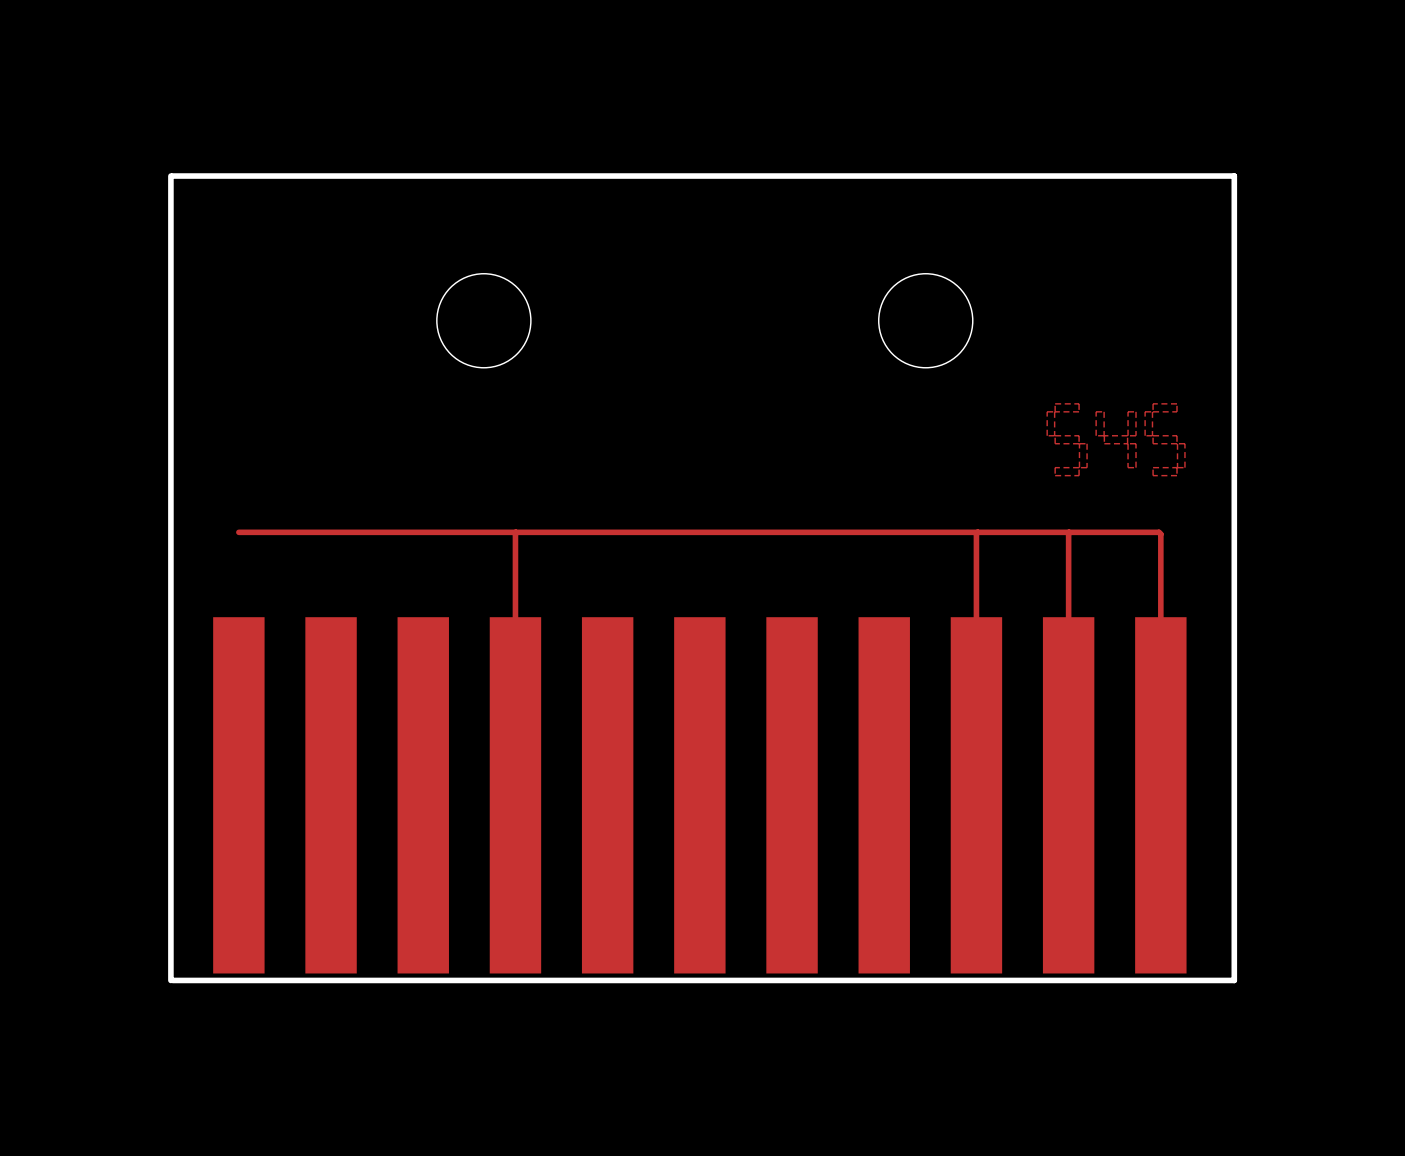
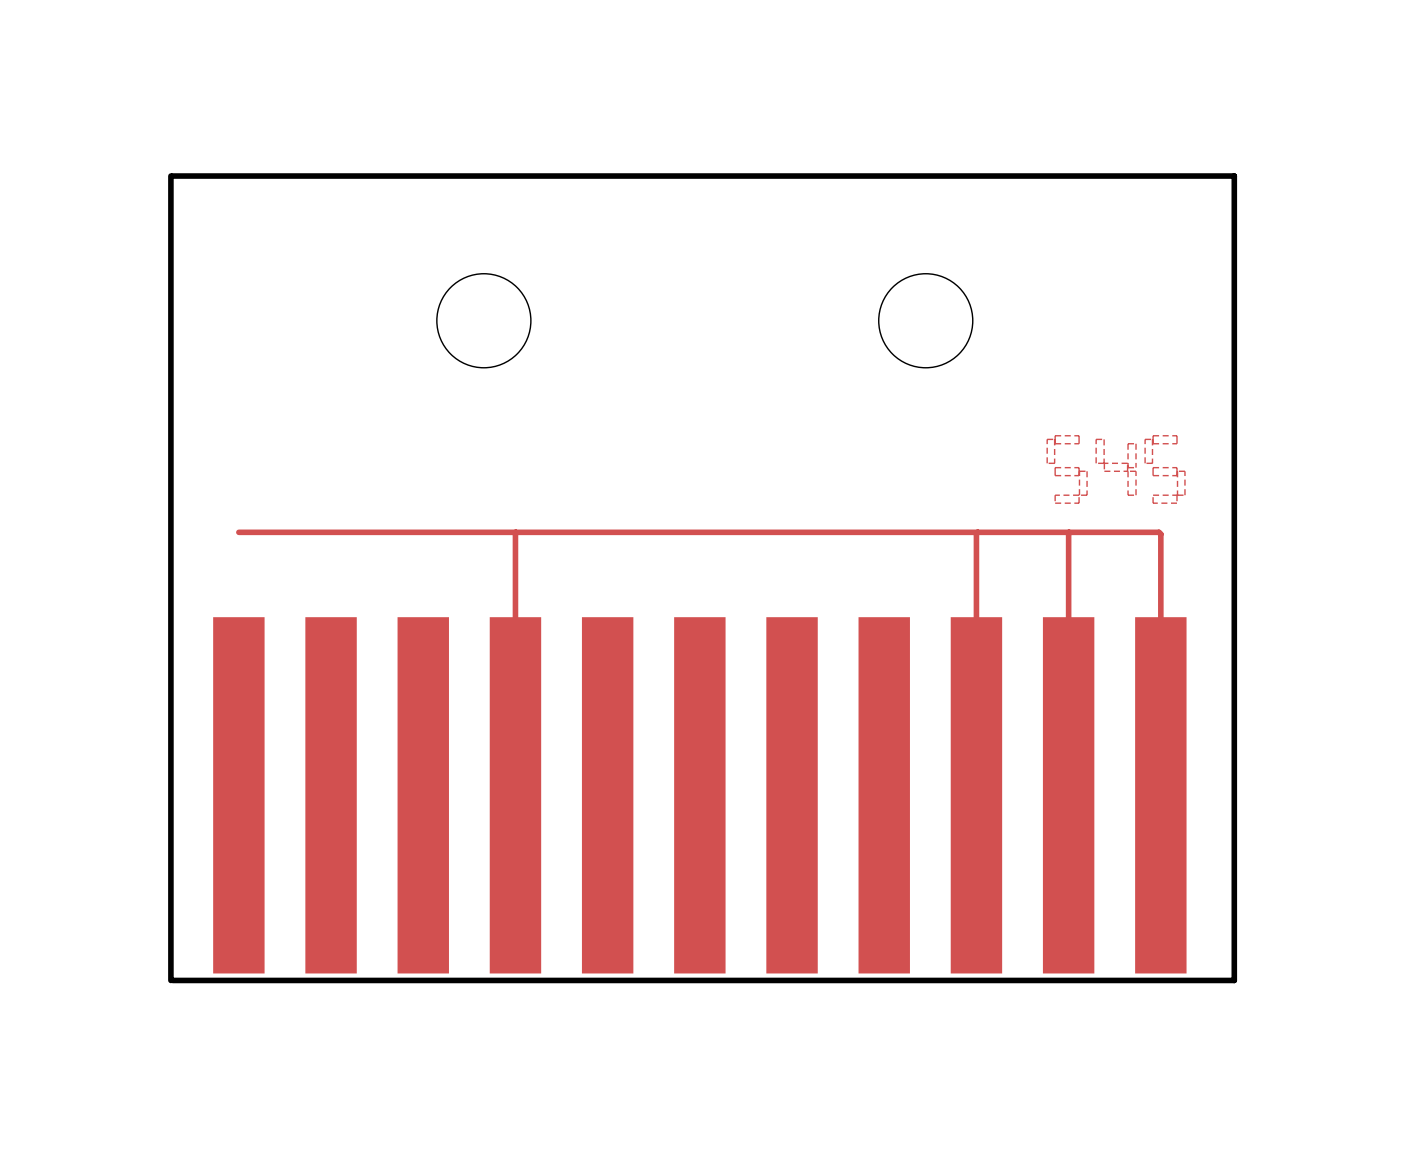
zone outline: (1055, 403) (1055, 411) (1079, 411) (1079, 403) (1055, 403) -> (1055, 495) (1055, 503) (1079, 503) (1079, 495) (1055, 495)
zone outline: (1153, 403) (1176, 403) (1176, 411) (1153, 411) (1153, 403) -> (1153, 495) (1176, 495) (1176, 503) (1153, 503) (1153, 495)
zone outline: (1047, 411) (1047, 435) (1054, 435) (1054, 411) (1047, 411) -> (1047, 439) (1047, 463) (1054, 463) (1054, 439) (1047, 439)
zone outline: (1128, 411) (1136, 411) (1136, 435) (1128, 435) (1128, 411) -> (1128, 471) (1136, 471) (1136, 495) (1128, 495) (1128, 471)
zone outline: (1145, 411) (1152, 411) (1152, 435) (1145, 435) (1145, 411) -> (1145, 439) (1152, 439) (1152, 463) (1145, 463) (1145, 439)
zone outline: (1104, 439) (1104, 411) (1096, 411) (1096, 435) (1127, 435) (1127, 443) (1104, 443) -> (1104, 439) (1096, 439) (1096, 463) (1127, 463) (1127, 471) (1104, 471) (1104, 443)
zone outline: (1079, 443) (1087, 443) (1087, 467) (1079, 467) (1079, 443) -> (1079, 471) (1087, 471) (1087, 495) (1079, 495) (1079, 471)
zone outline: (1177, 443) (1184, 443) (1184, 467) (1177, 467) (1177, 443) -> (1177, 471) (1184, 471) (1184, 495) (1177, 495) (1177, 471)

